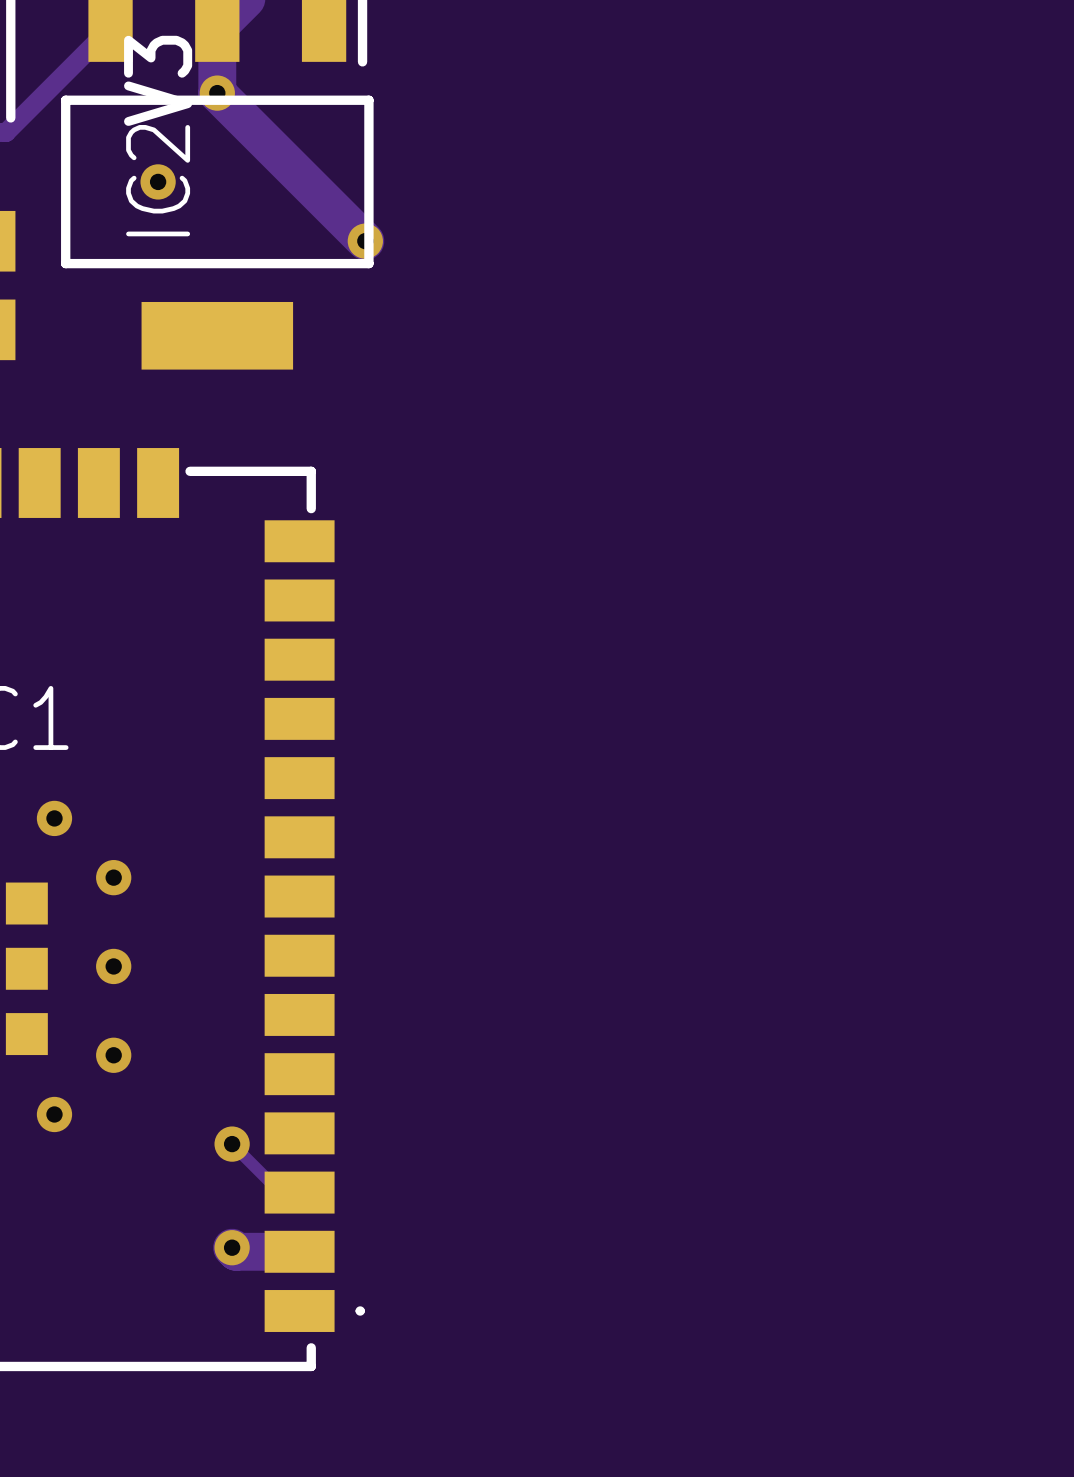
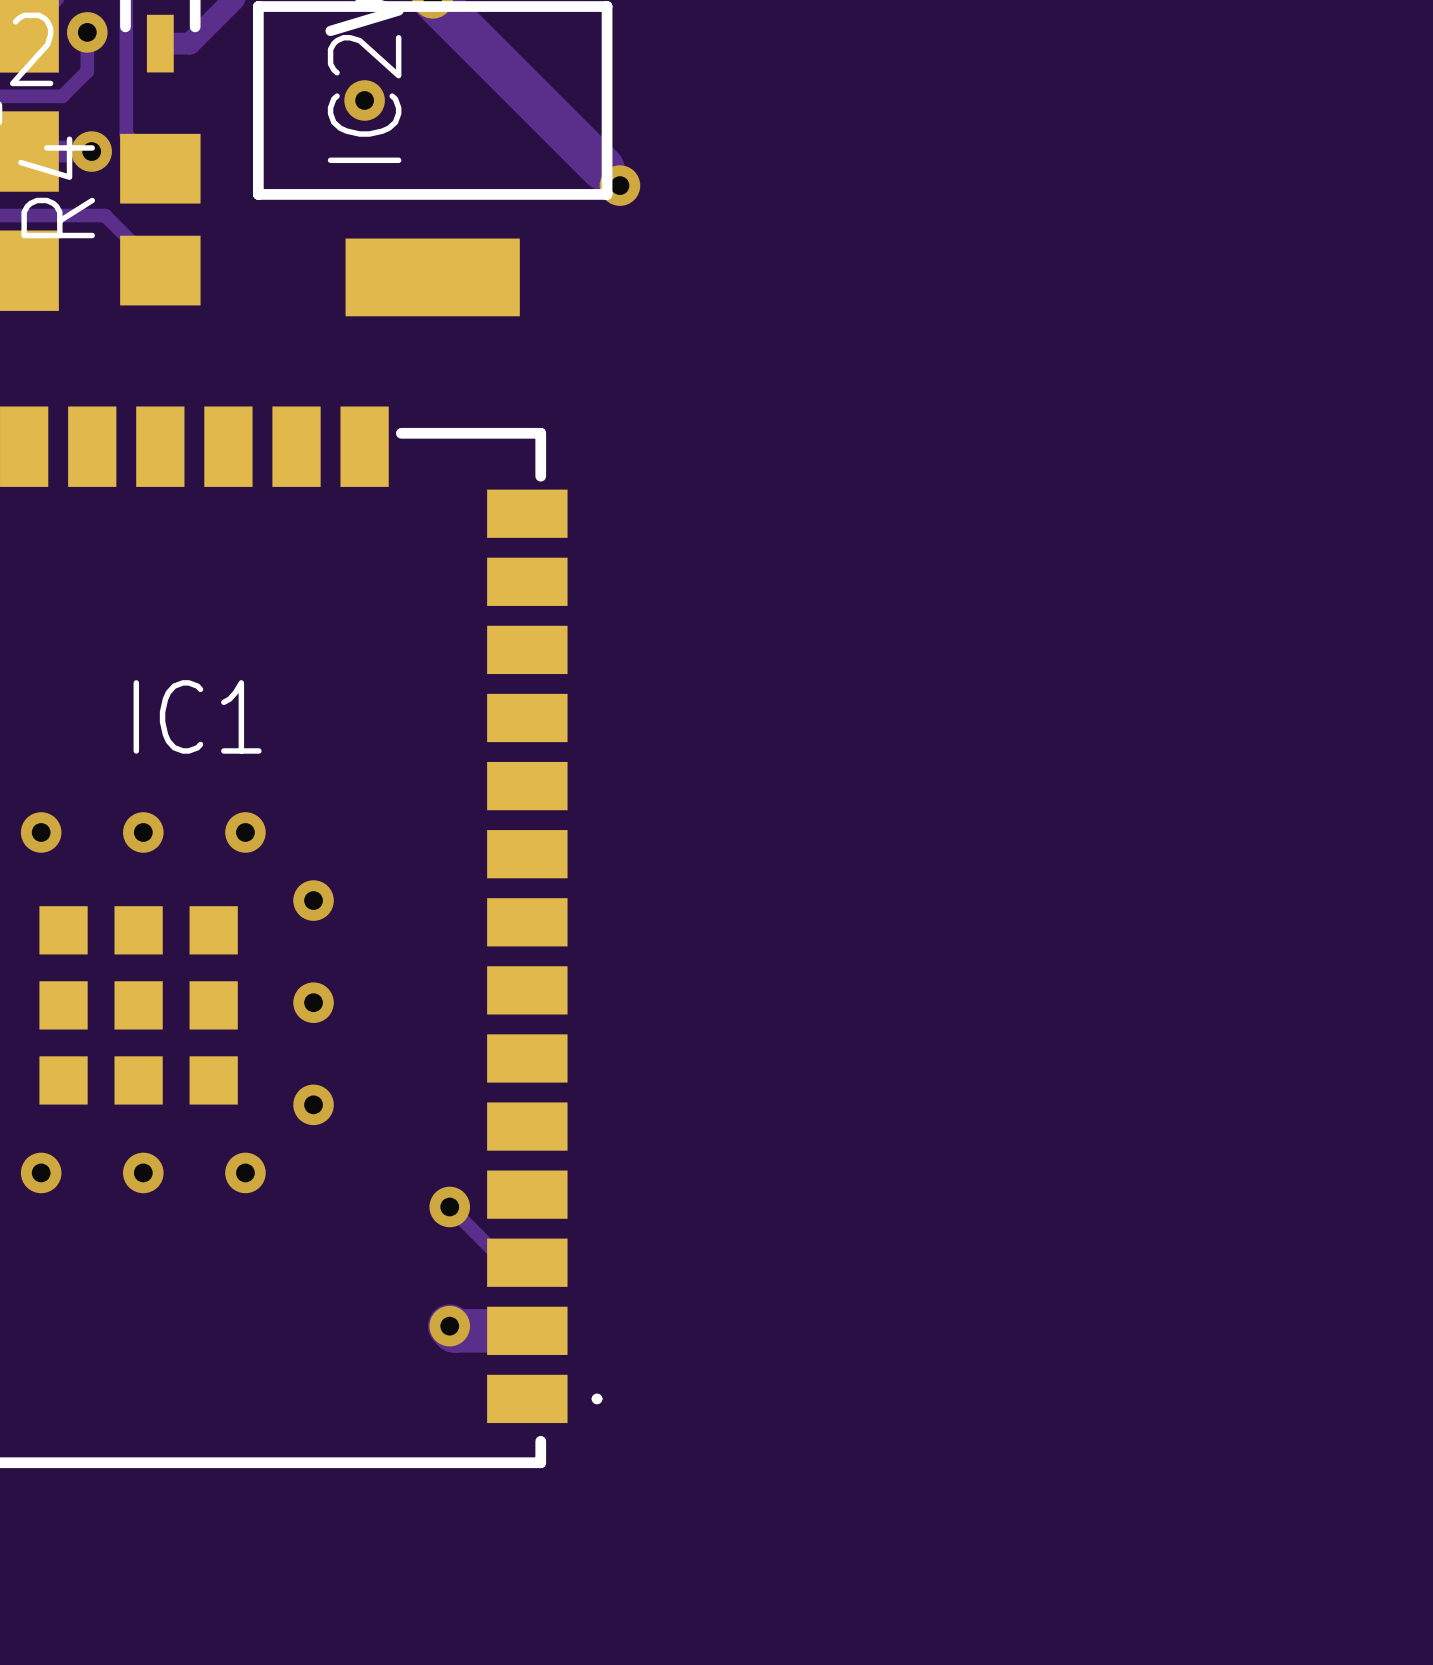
via position: (365, 241) -> (619, 185)

